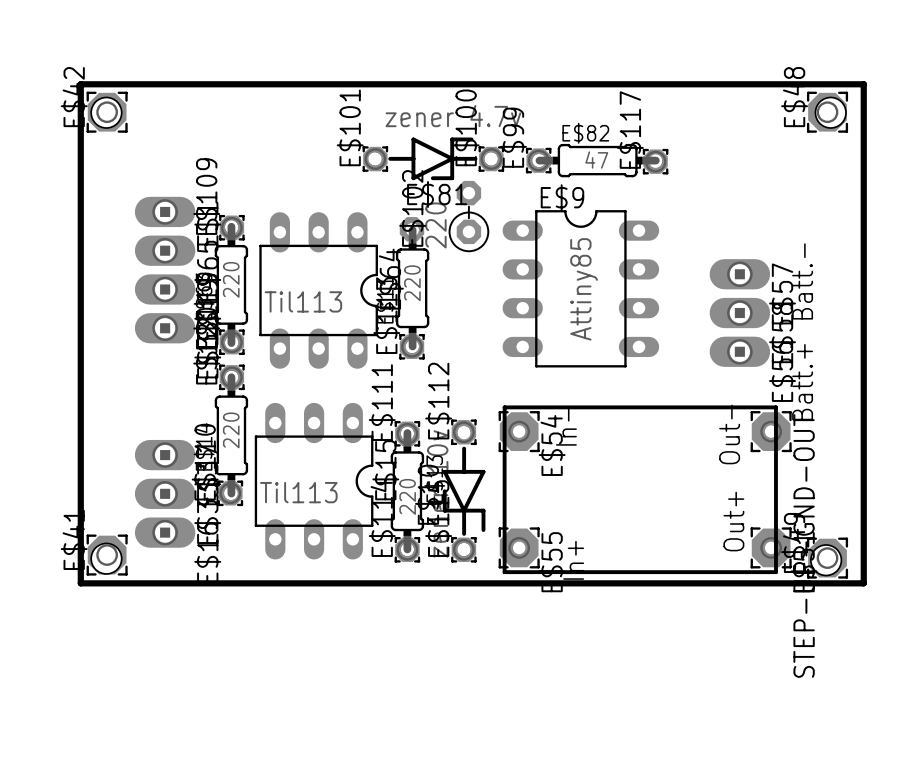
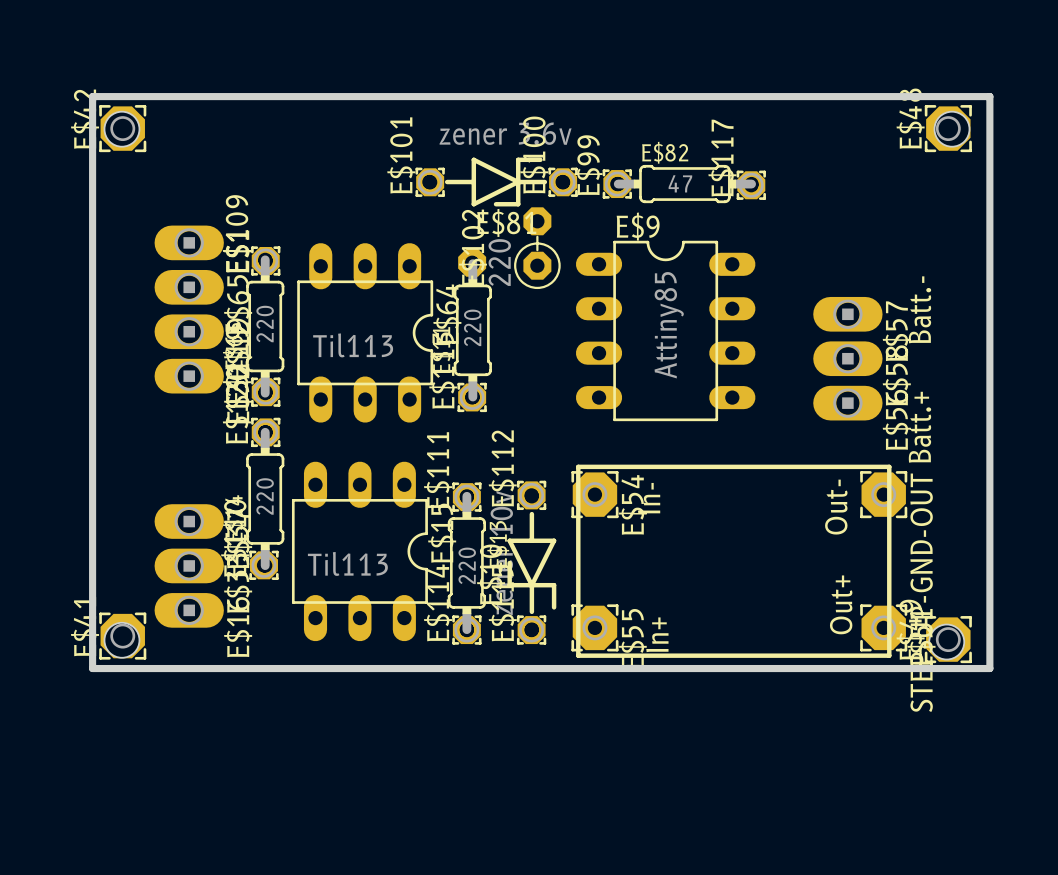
E$81 value: zener 4.7v (453, 116) -> zener 3.6v (505, 133)

